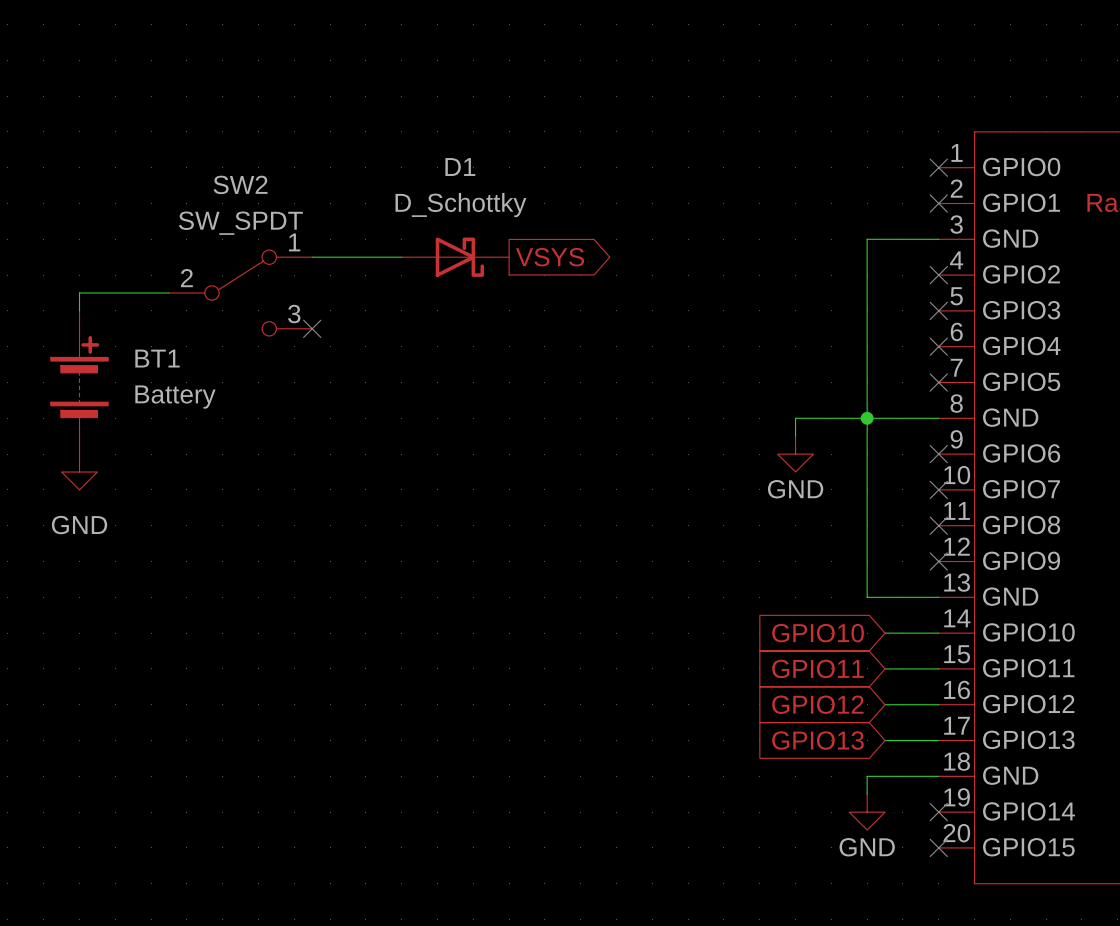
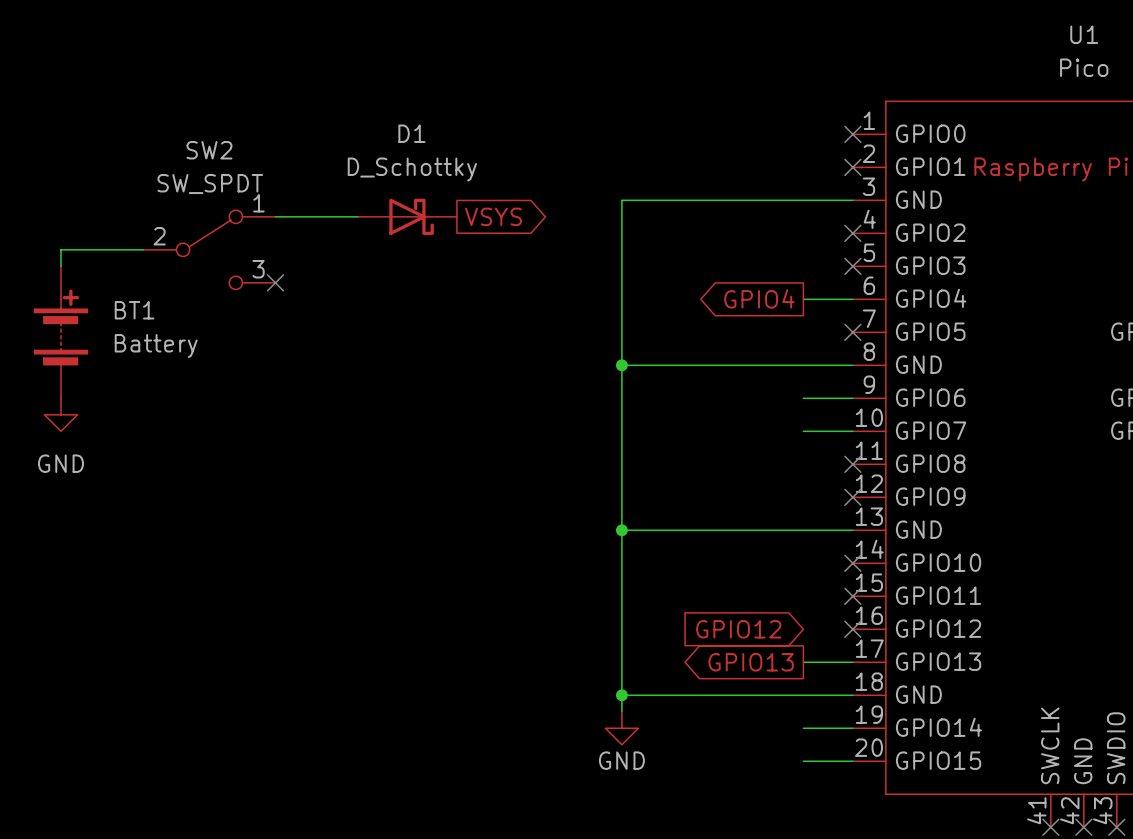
wire: (867, 239) (867, 597) -> (786, 200) (621, 200) (621, 711)
global label: none -> GPIO4 (759, 298)
wire: none -> (803, 299) (852, 299)
no-connect mark: (938, 346) -> none
junction: none -> (621, 365)
wire: (795, 418) (795, 436) -> (720, 365) (621, 365)
junction: (867, 418) -> none
power symbol: GND (795, 454) -> none
no-connect mark: (938, 454) -> none
wire: none -> (803, 431) (852, 431)
no-connect mark: (938, 489) -> none
wire: none -> (621, 530) (786, 530)
junction: none -> (621, 530)
global label: GPIO10 (818, 633) -> none
wire: (885, 633) (938, 633) -> (803, 398) (852, 398)
no-connect mark: none -> (852, 563)
global label: GPIO11 (817, 668) -> none
wire: (885, 668) (938, 668) -> (803, 728) (852, 728)
no-connect mark: none -> (852, 596)
wire: (885, 704) (938, 704) -> (803, 761) (852, 761)
no-connect mark: none -> (852, 629)
global label shape: input (818, 740) -> output (751, 662)
junction: none -> (621, 695)
wire: (867, 776) (867, 794) -> (786, 695) (621, 695)
power symbol position: GND (867, 812) -> GND (621, 728)
no-connect mark: (938, 812) -> none
no-connect mark: (938, 847) -> none

